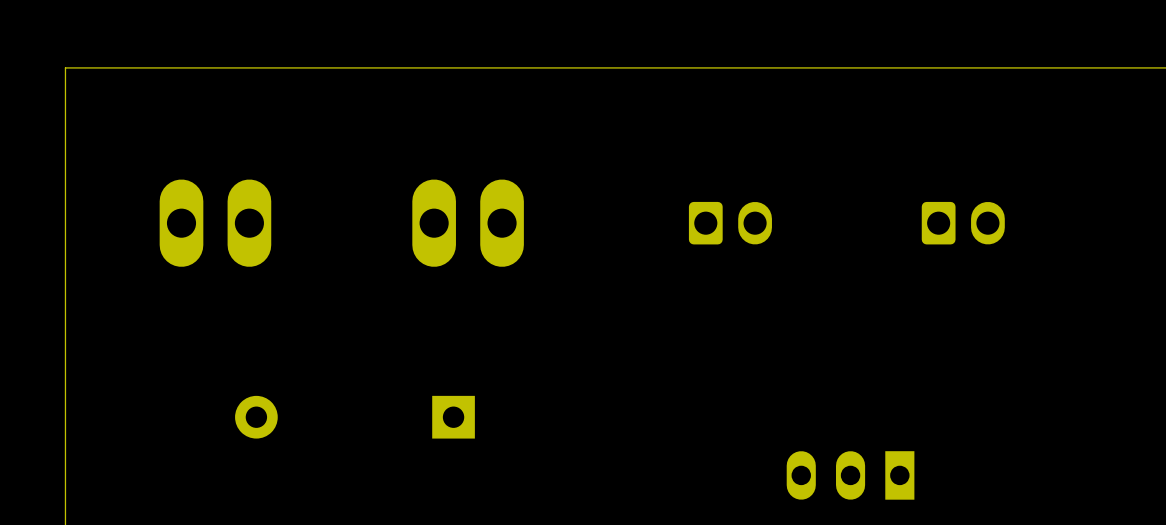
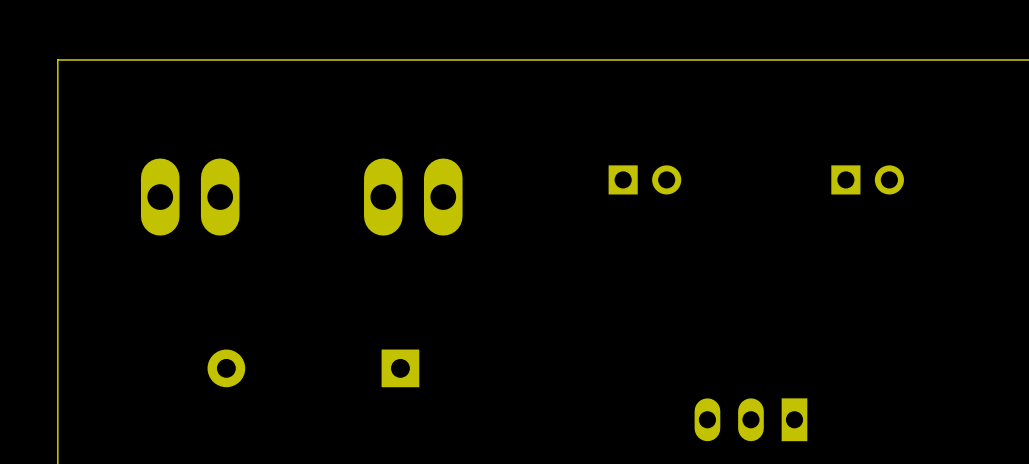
part: none -> (644, 179)
part: none -> (867, 179)
part: (730, 223) -> none
part: (963, 223) -> none

